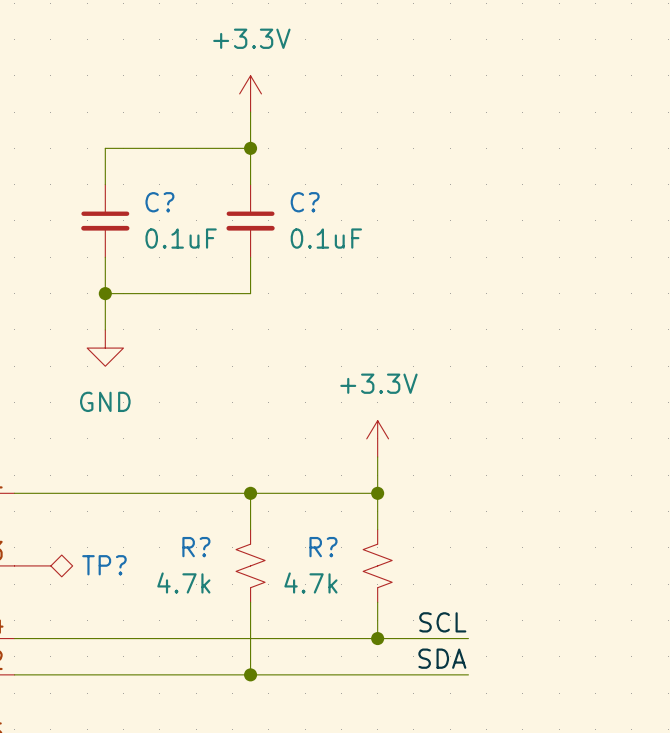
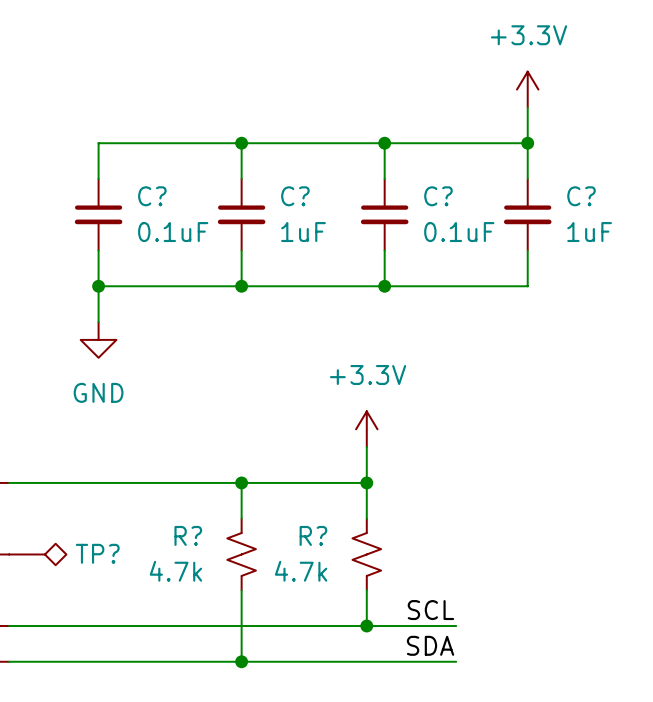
power symbol position: +3.3V (250, 93) -> +3.3V (527, 89)
wire: (250, 112) (250, 148) -> (527, 143) (241, 143)
wire: none -> (527, 107) (527, 178)
wire: none -> (384, 143) (384, 178)
junction: none -> (384, 143)
junction: none -> (527, 143)
C?: none -> 0.1uF (384, 214)
C?: none -> 1uF (527, 214)
C? value: 0.1uF (326, 238) -> 1uF (303, 232)
wire: none -> (384, 250) (384, 286)
wire: none -> (527, 250) (527, 286) (241, 286)
junction: none -> (241, 286)
junction: none -> (384, 286)

